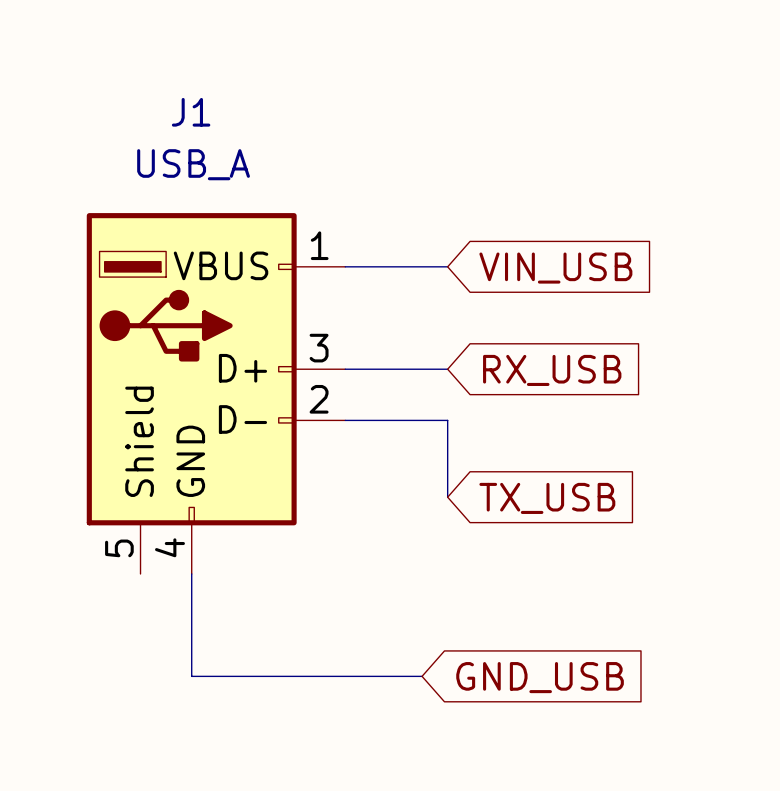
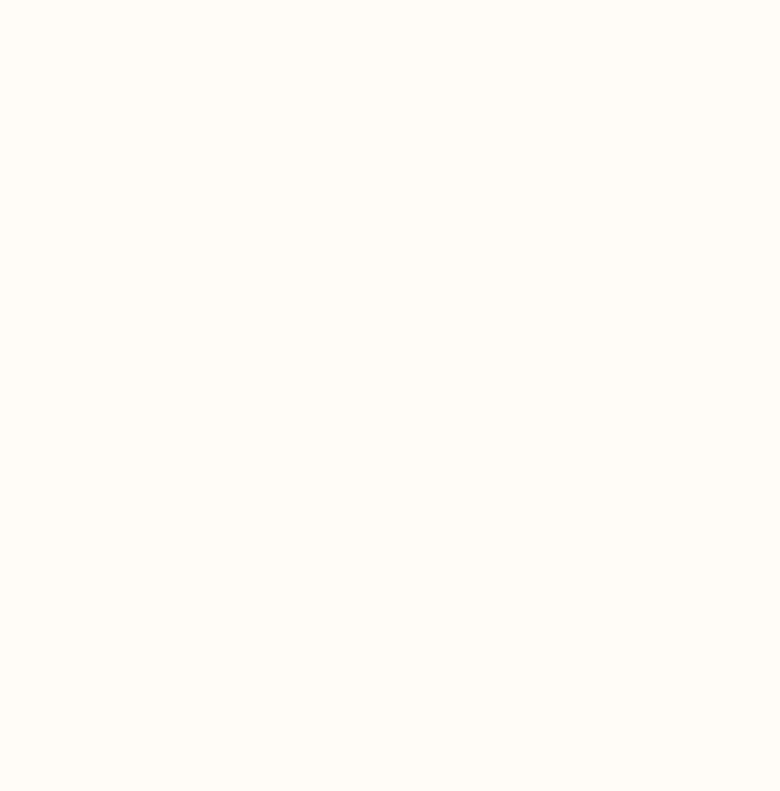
wire: (345, 266) (447, 266) -> none
global label: VIN_USB (555, 268) -> none
wire: (345, 369) (447, 369) -> none
global label: RX_USB (552, 370) -> none
J1: USB_A (216, 393) -> none
wire: (345, 420) (447, 420) (447, 497) -> none
global label: TX_USB (547, 498) -> none
wire: (191, 573) (191, 676) (422, 676) -> none
global label: GND_USB (540, 677) -> none

